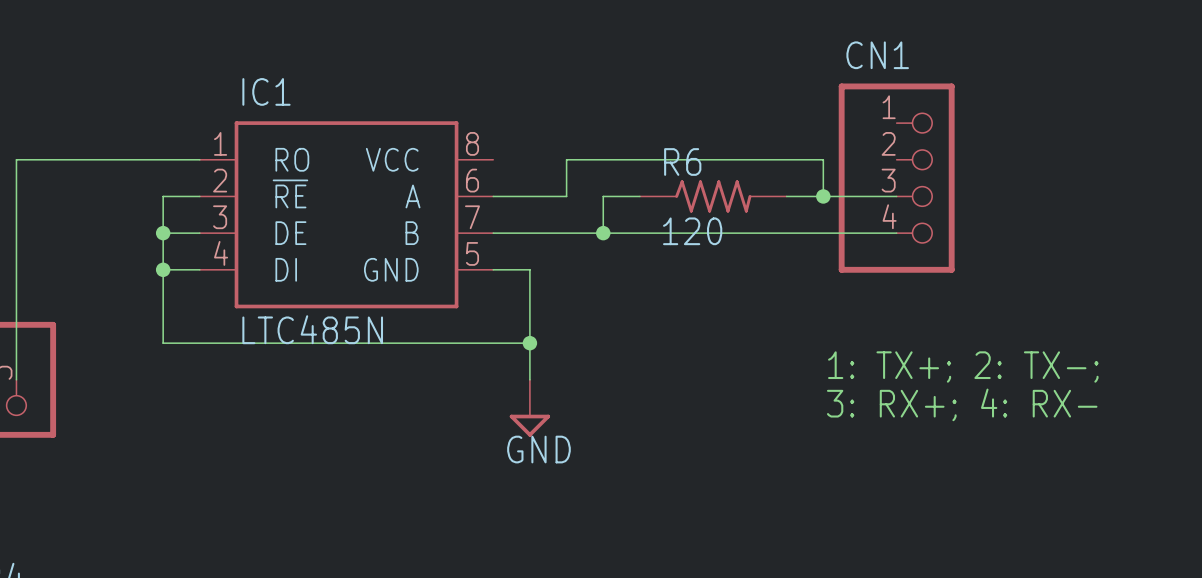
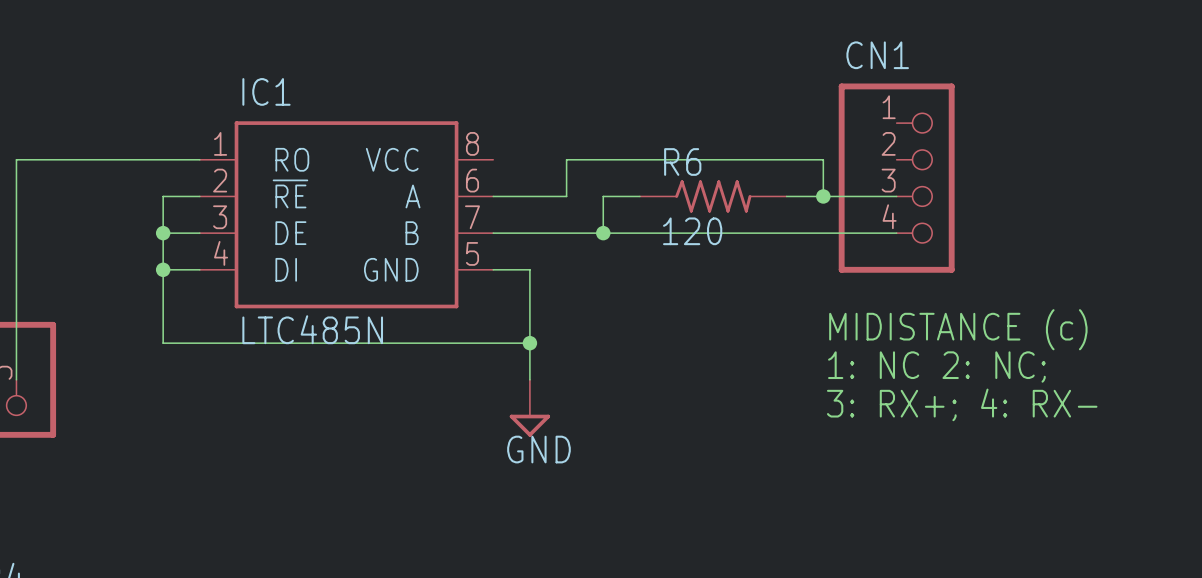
text: none -> MIDISTANCE (c) (958, 329)
text: 1: TX+; 2: TX-; (963, 367) -> 1: NC 2: NC; (936, 367)

